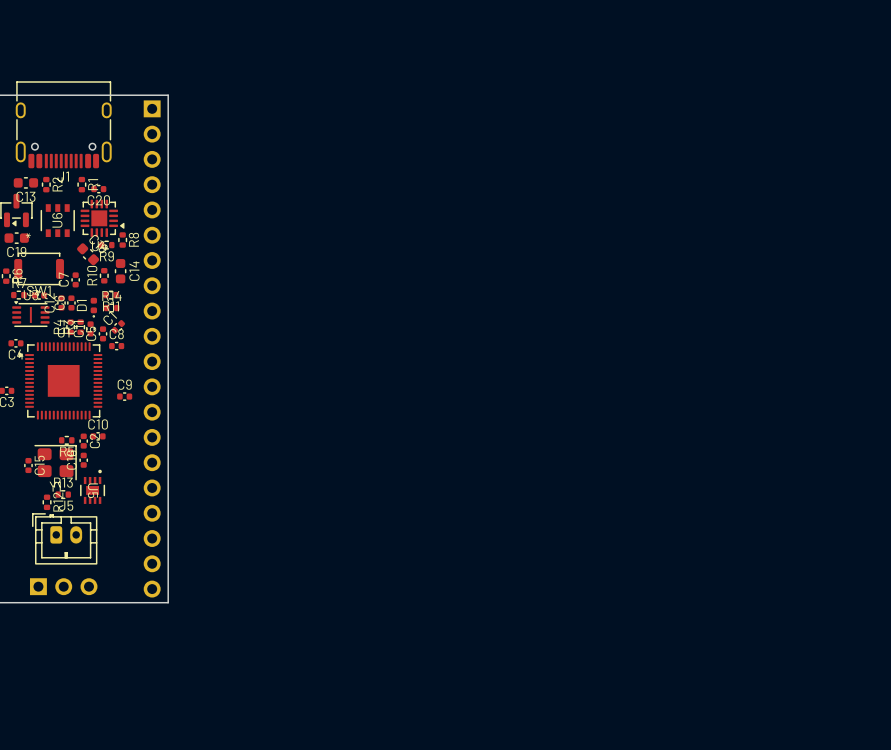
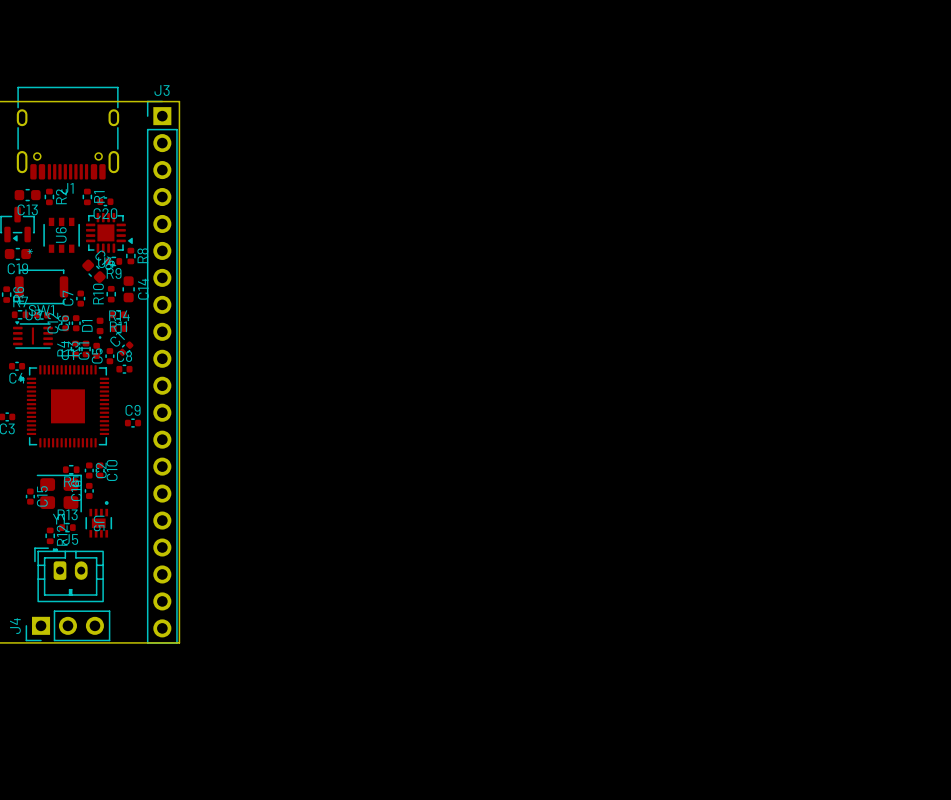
J3 side: bottom (152, 348) -> top (162, 372)
C10 rotation: 0° (98, 436) -> 90° clockwise (100, 470)
J4 side: bottom (63, 586) -> top (67, 625)

